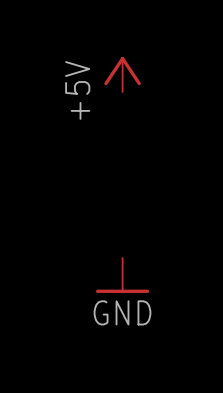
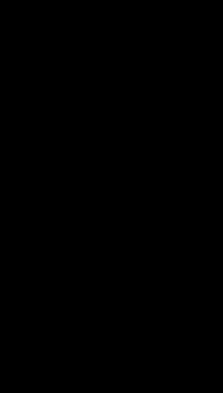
power symbol: +5V (122, 74) -> none
power symbol: GND (122, 275) -> none

